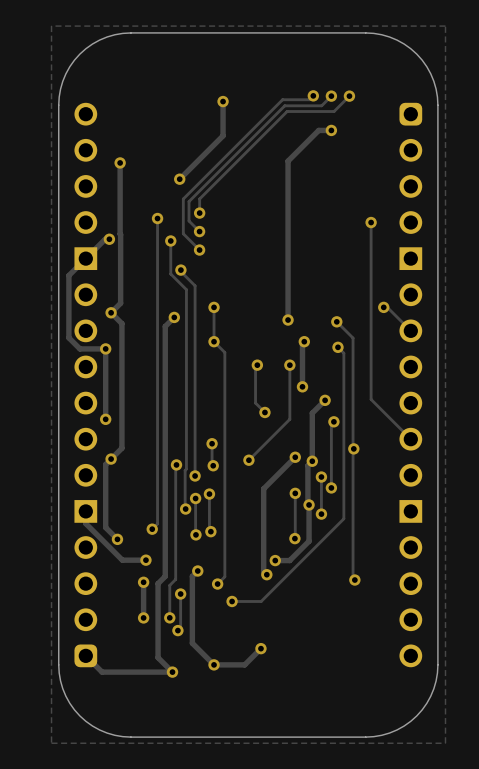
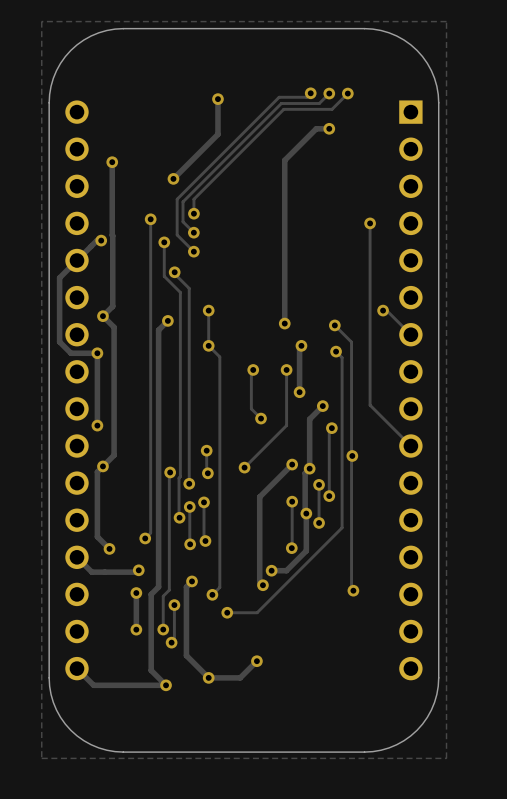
part footprint: [58, 32, 439, 738] -> [48, 27, 440, 753]
track: (85, 511) (85, 523) (122, 560) (145, 560) -> (76, 557) (91, 572) (136, 572) (138, 570)

